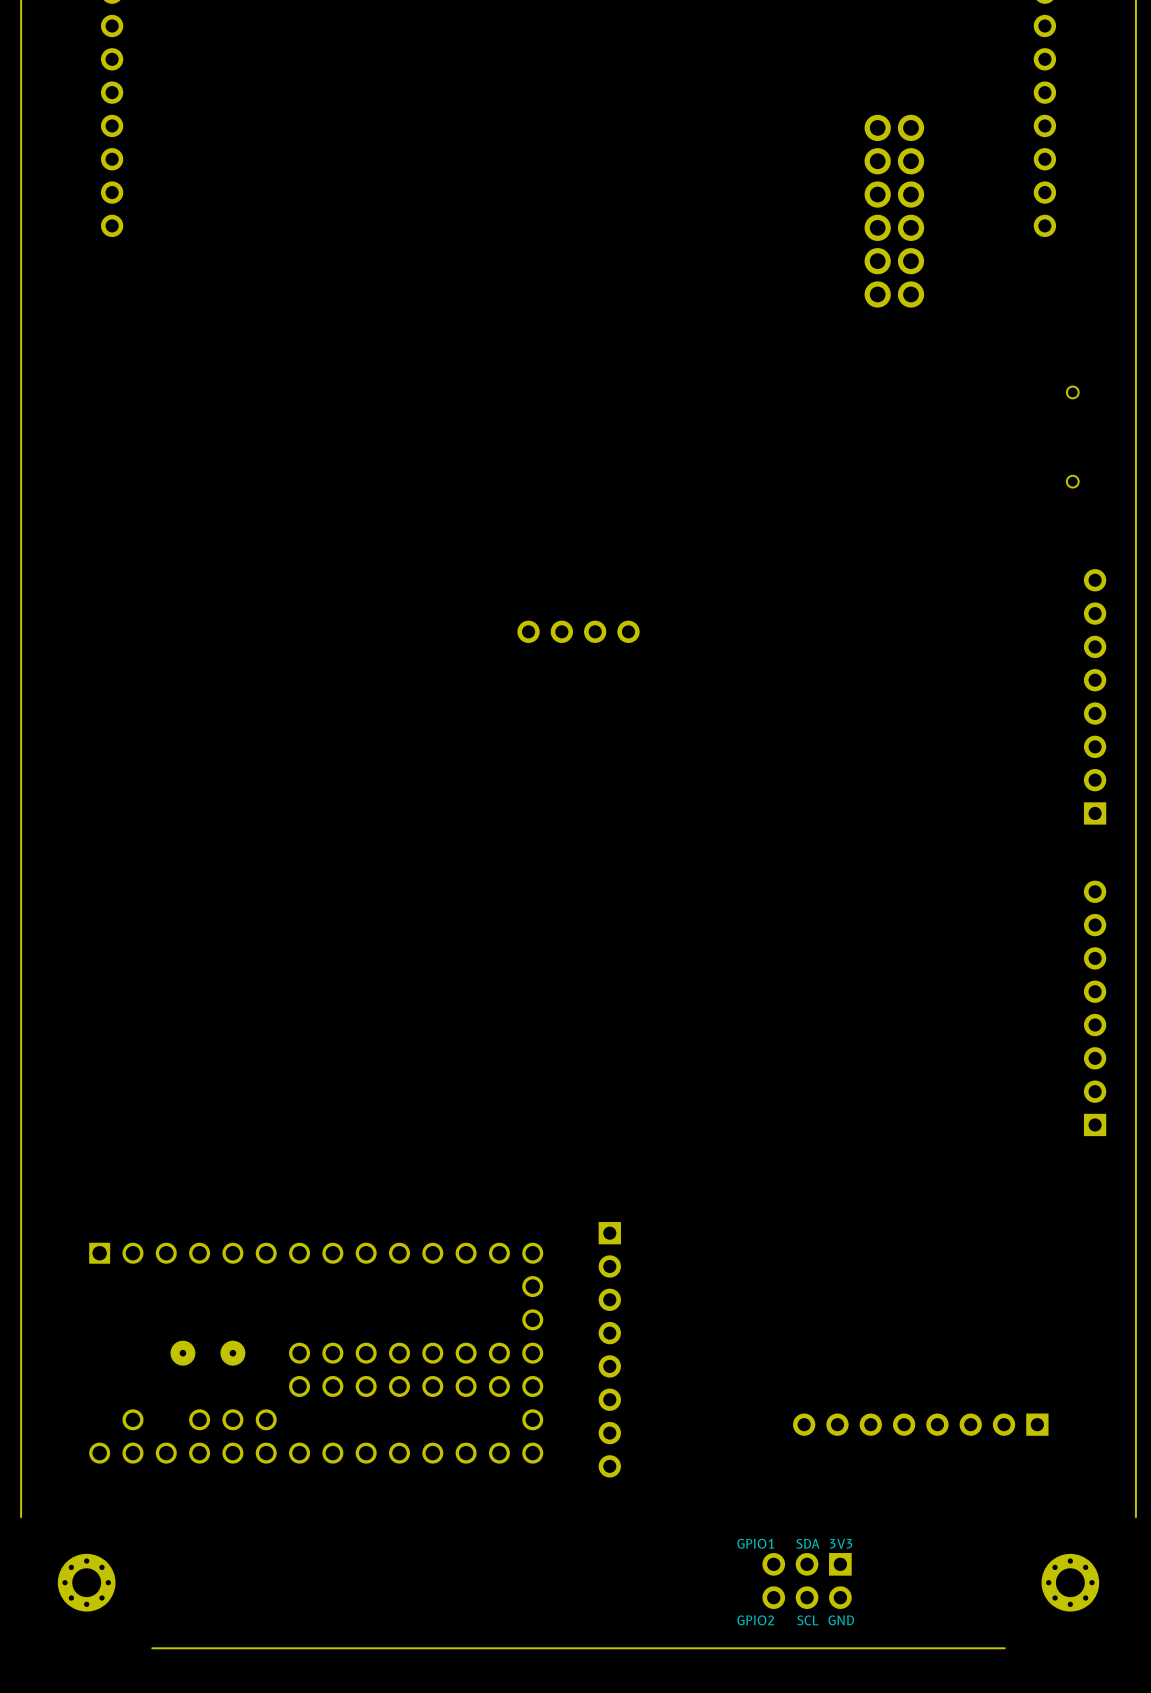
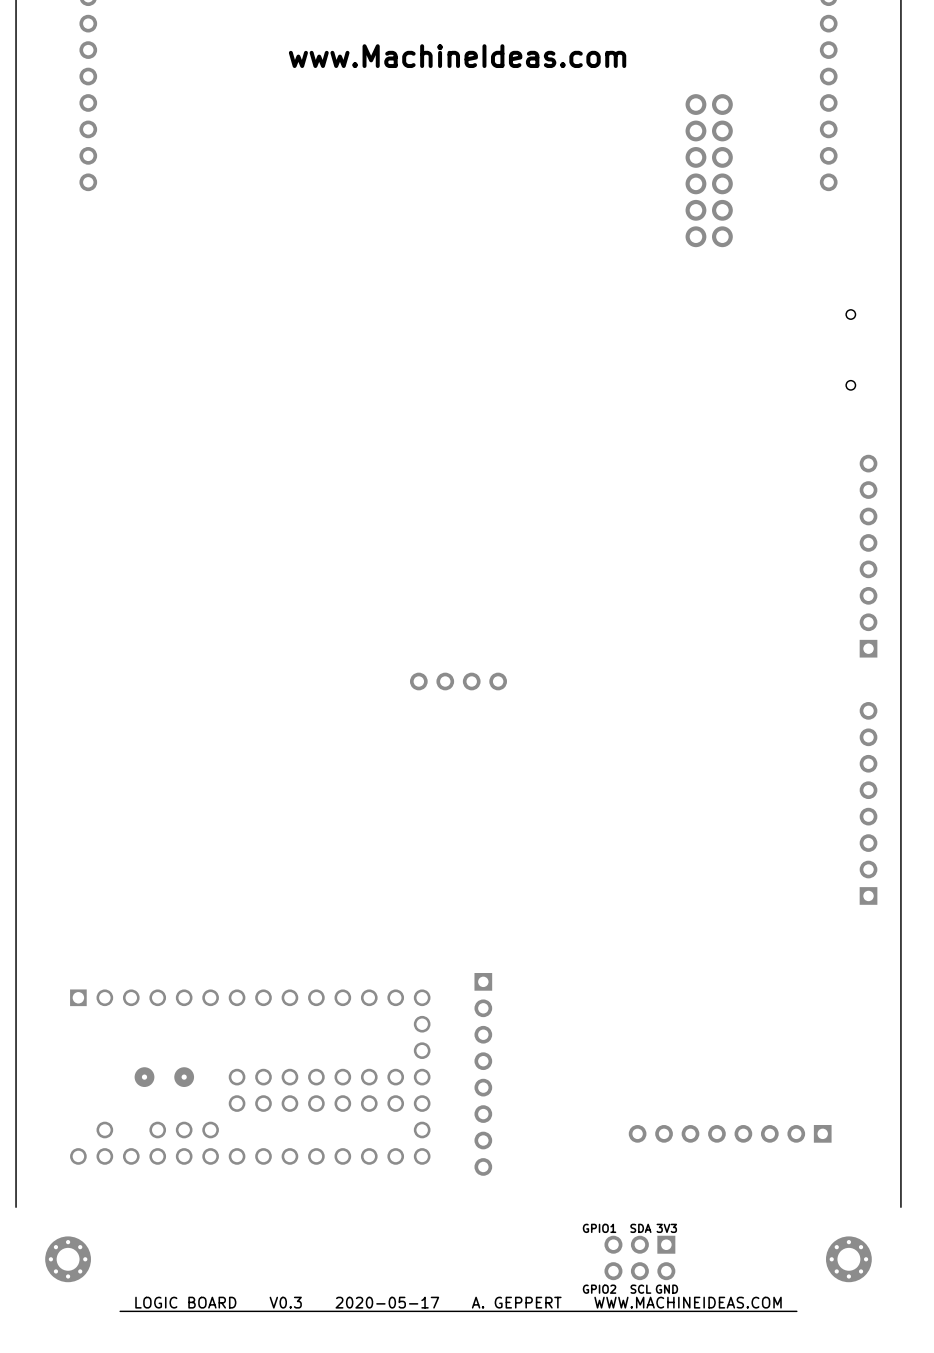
text: none -> www.MachineIdeas.com (457, 56)
part position: (578, 631) -> (458, 681)
text: none -> LOGIC BOARD V0.3 2020-05-17 A. GEPPERT WWW.MACHINEIDEAS.COM (458, 1302)

